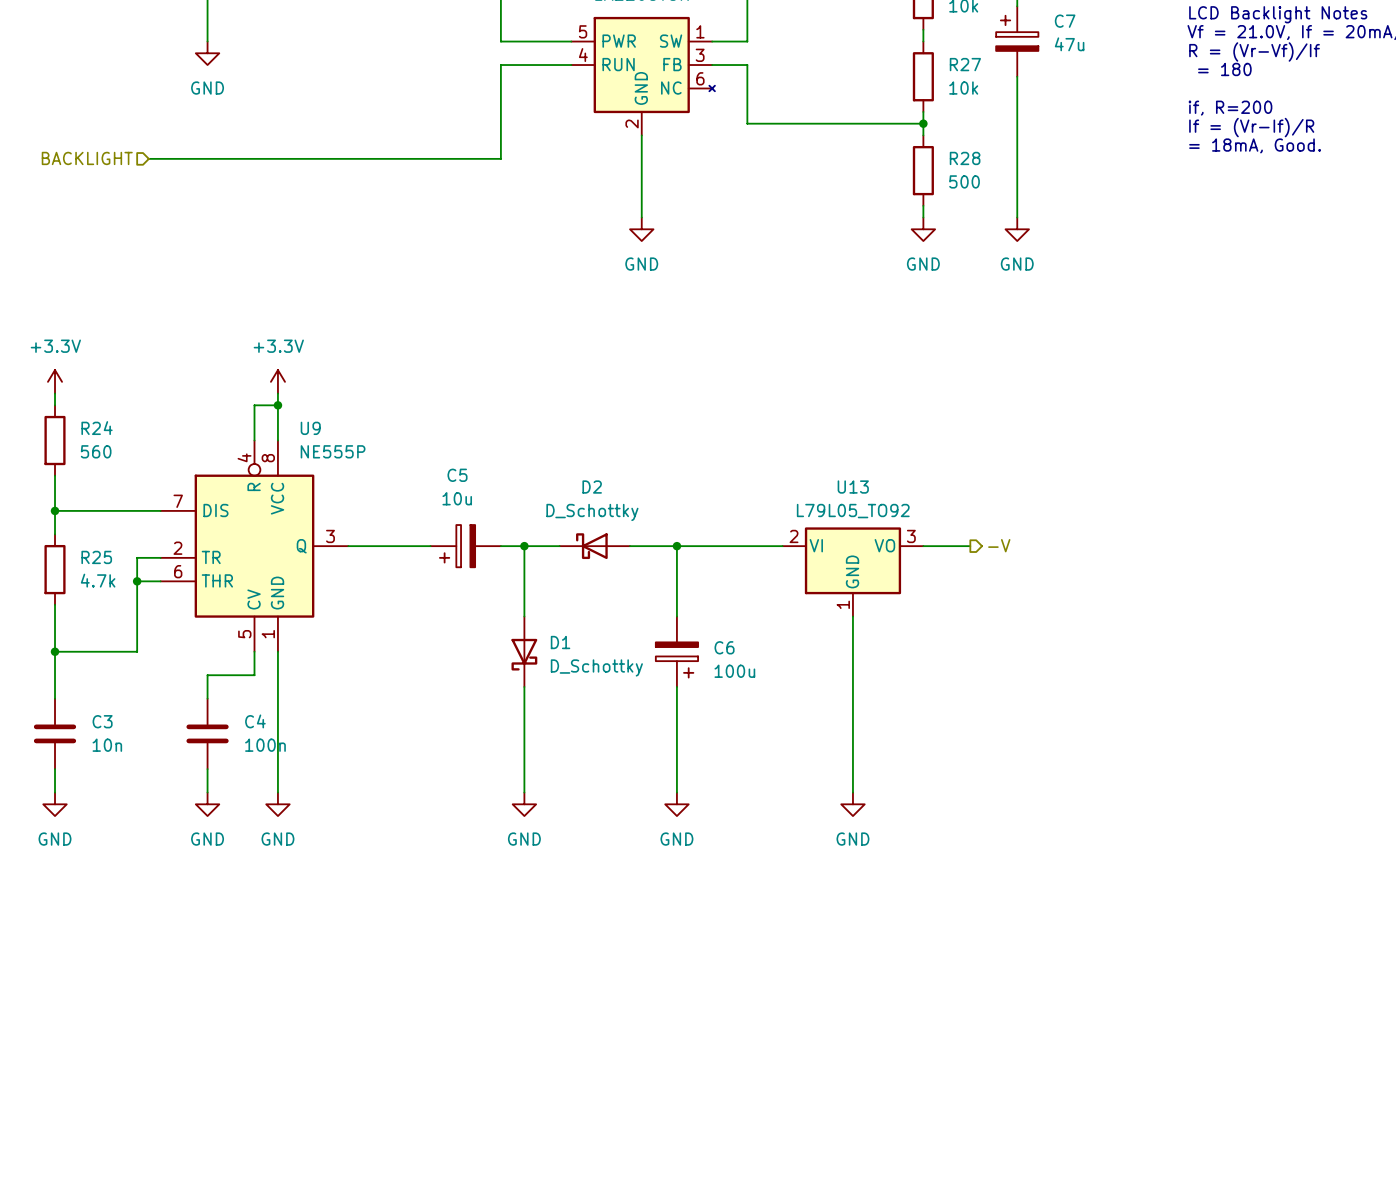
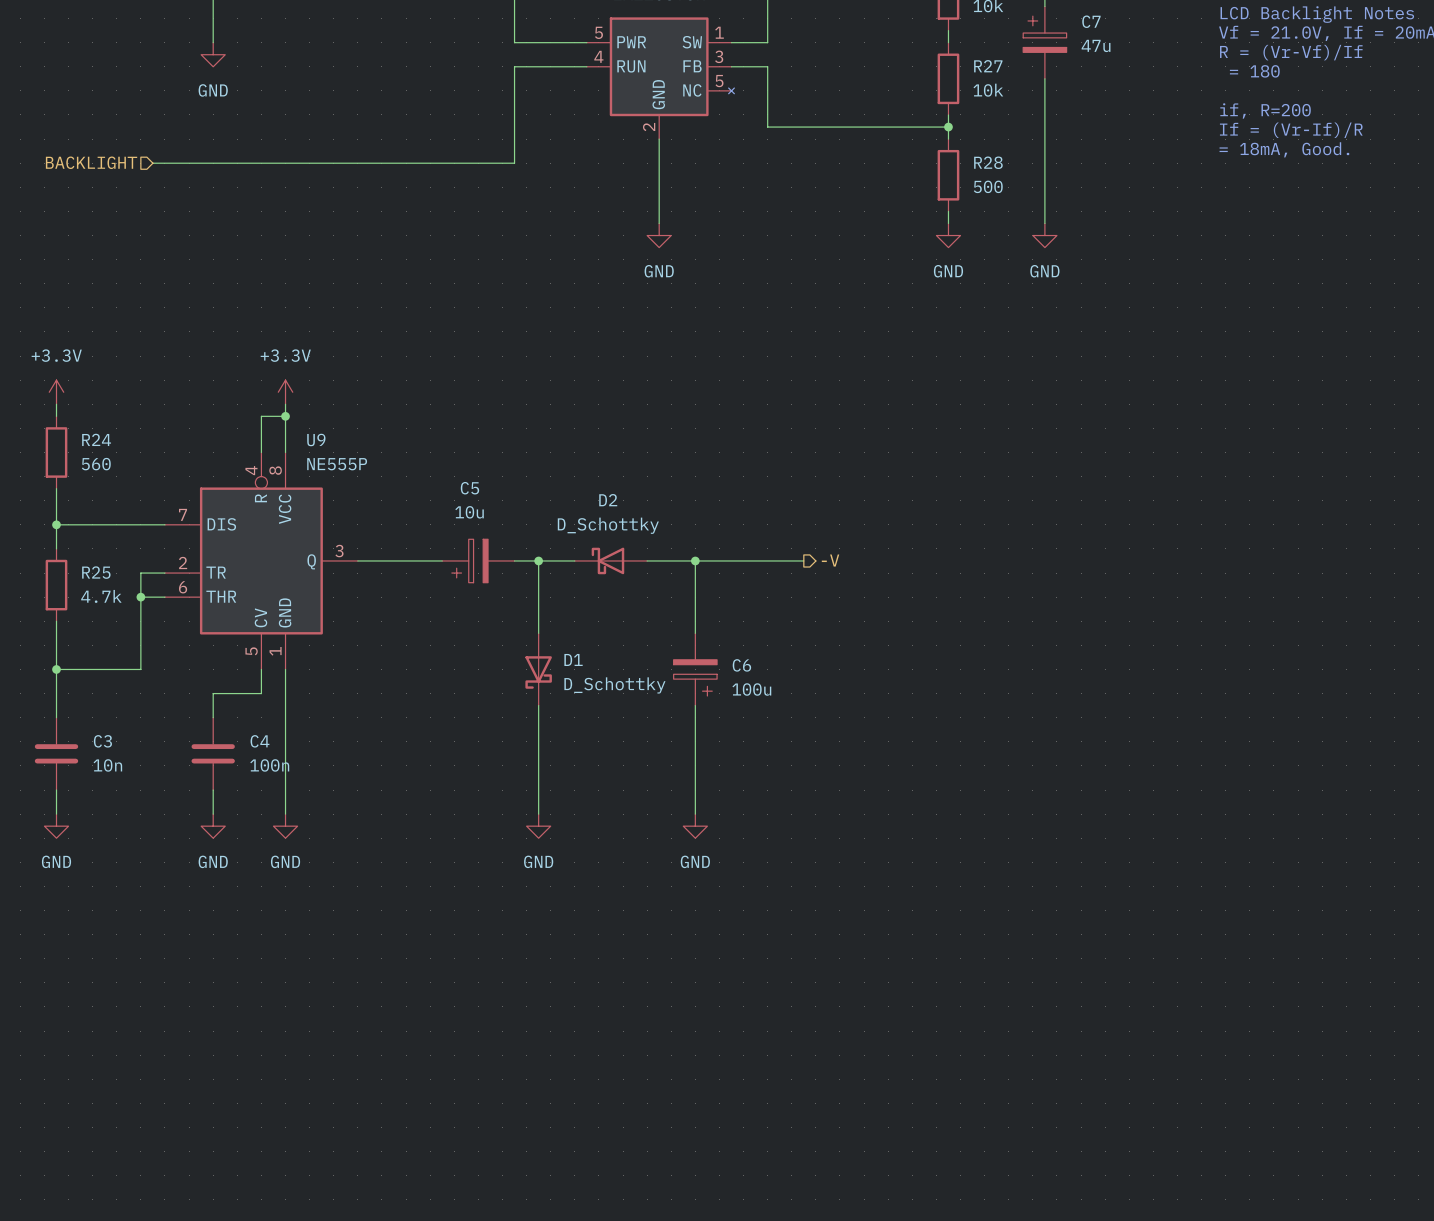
part pin number: 6 (700, 78) -> 5 (719, 81)
hierarchical label position: -V (999, 545) -> -V (830, 560)
wire: (923, 546) (970, 546) -> none
U13: L79L05_TO92 (852, 571) -> none
wire: (852, 616) (852, 792) -> none
power symbol: GND (852, 804) -> none

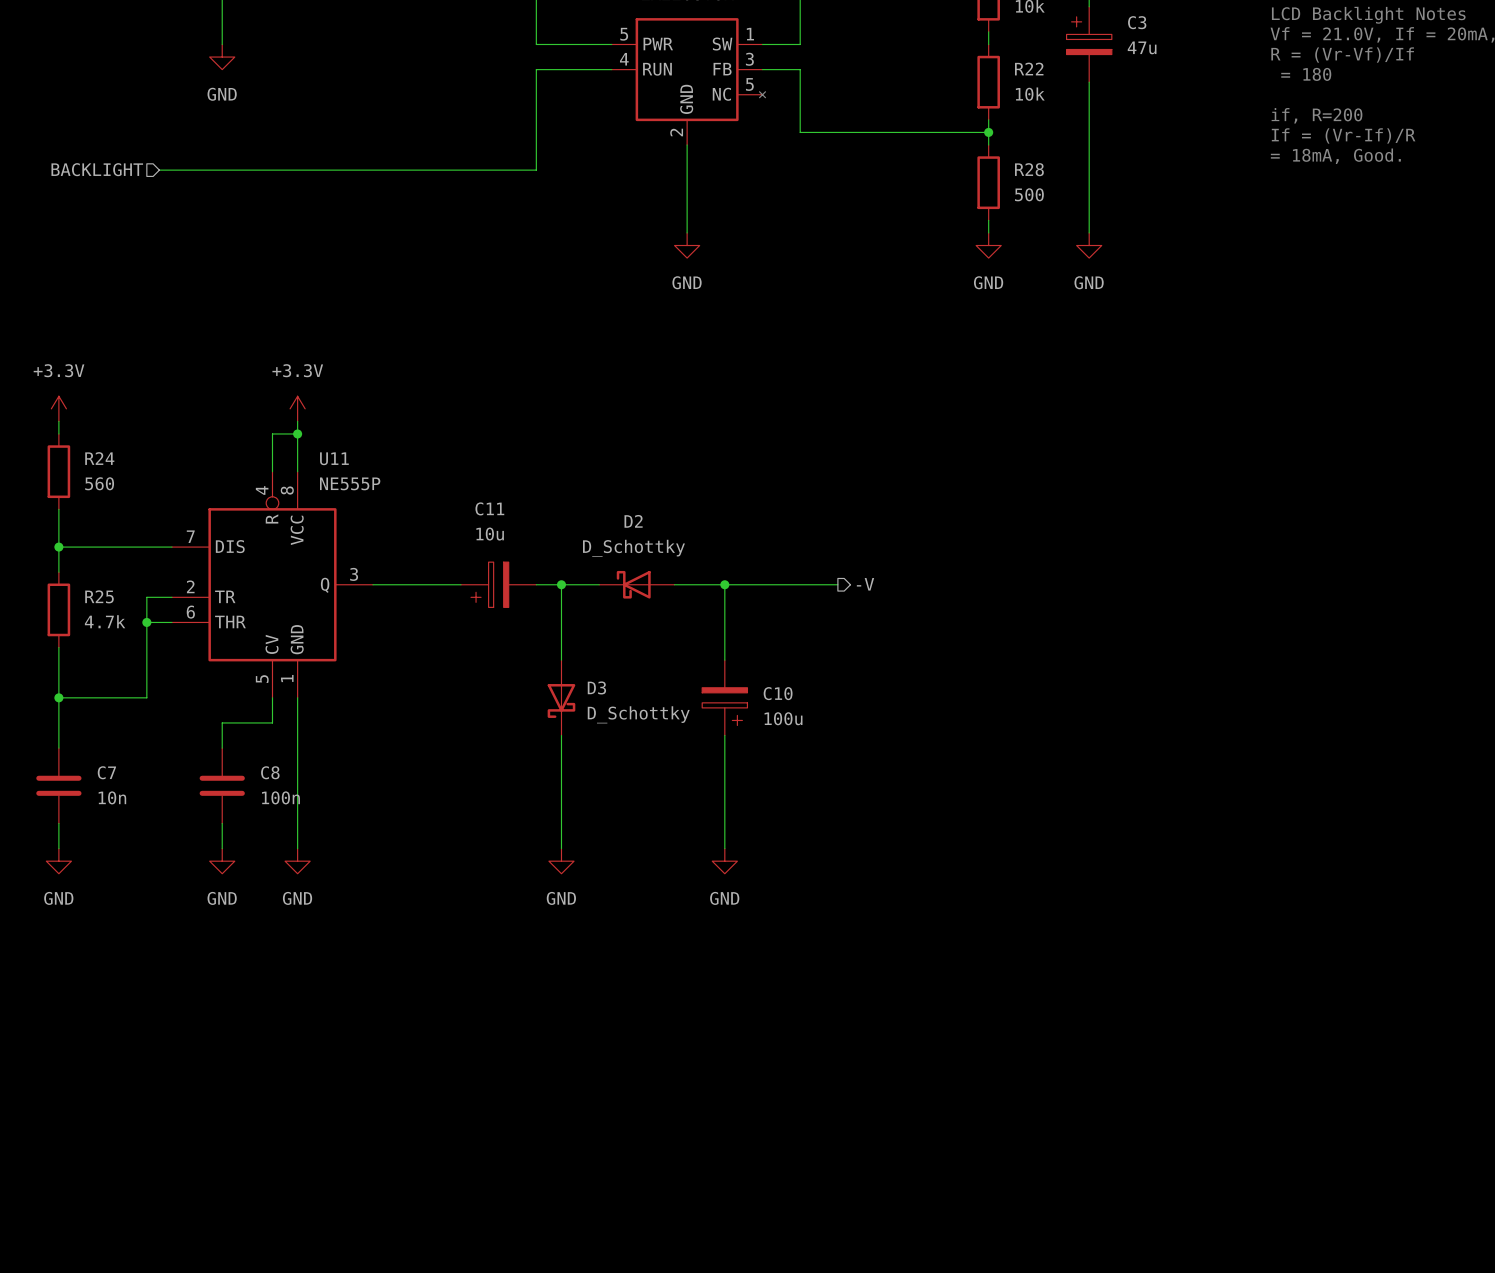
C7 name: C7 (1091, 21) -> C3 (1137, 22)
R27 name: R27 (988, 66) -> R22 (1029, 69)
U9 name: U9 (316, 439) -> U11 (334, 458)
C5 name: C5 (469, 488) -> C11 (489, 508)
D1 name: D1 (573, 659) -> D3 (596, 687)
C6 name: C6 (741, 665) -> C10 (778, 693)
C3 name: C3 (102, 741) -> C7 (106, 772)
C4 name: C4 (260, 741) -> C8 (270, 772)

